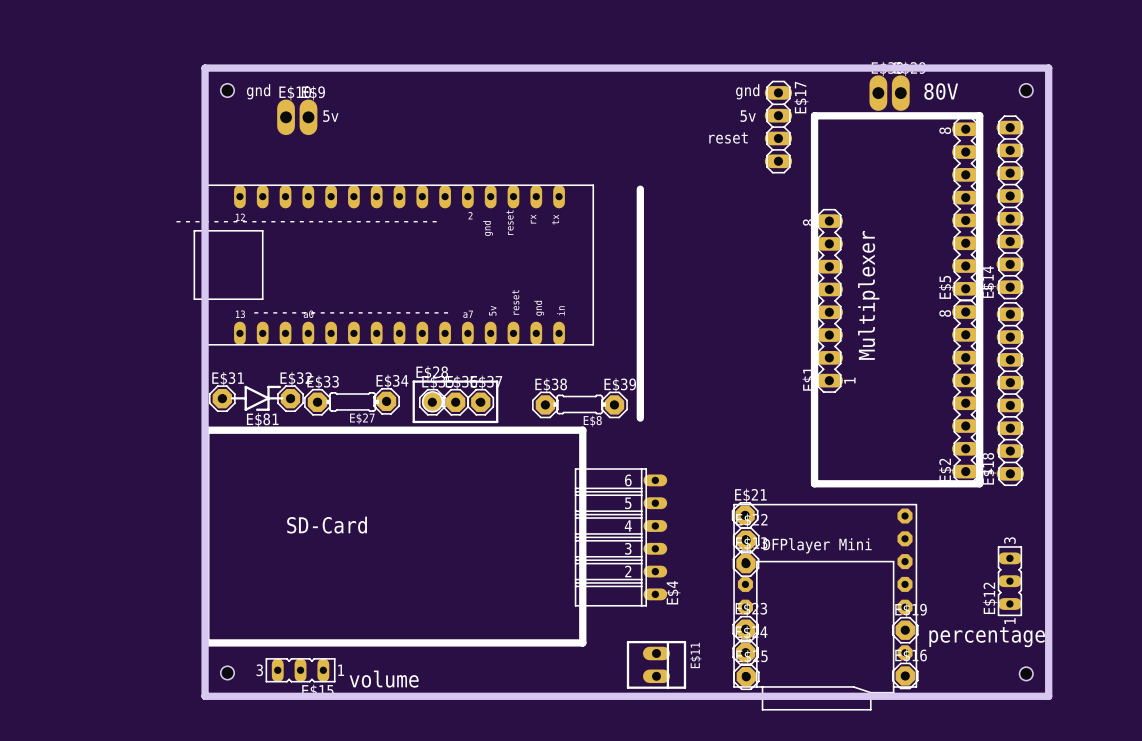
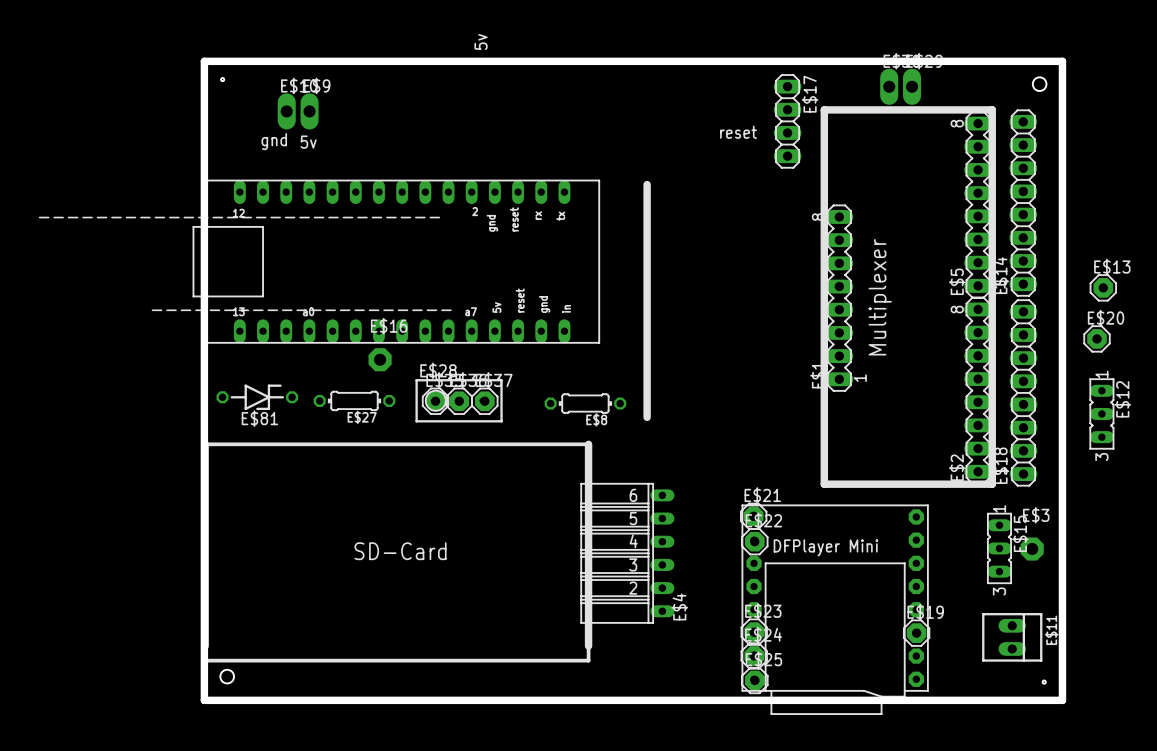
text: none -> 5v (481, 42)
hole size: [220, 83, 235, 98] -> [221, 78, 225, 82]
text position: gnd (258, 91) -> gnd (274, 141)
text: gnd (747, 91) -> none
text: 80V (941, 91) -> none
text position: 5v (330, 116) -> 5v (308, 142)
text: 5v (748, 116) -> none
E$20: none -> (1097, 338)
E$31: (222, 398) -> none
E$32: (290, 398) -> none
E$34: (386, 401) -> none
E$33: (317, 402) -> none
E$38: (545, 404) -> none
E$39: (614, 404) -> none
line: (205, 444) (205, 430) (582, 430) (582, 444) -> (205, 444) (588, 444)
text position: SD-Card (327, 525) -> SD-Card (400, 551)
E$4 position: (621, 537) -> (627, 553)
E$12 text position: 3 (1009, 540) -> 3 (1101, 457)
E$3: none -> (1032, 548)
E$13 position: (746, 563) -> (1103, 287)
E$12 position: (1009, 581) -> (1101, 413)
E$12 name position: E$12 (990, 598) -> E$12 (1122, 399)
E$12 text position: 1 (1009, 621) -> 1 (1101, 374)
text: percentage (987, 637) -> none
line: (205, 642) (582, 642) -> (205, 646) (205, 660) (588, 660) (588, 646)
E$16 footprint: [892, 662, 919, 690] -> [368, 348, 392, 372]
E$11 position: (656, 664) -> (1012, 637)
hole size: [1019, 667, 1033, 681] -> [1042, 680, 1046, 684]
E$15 rotation: 0° (300, 670) -> 90° counterclockwise (999, 548)
E$15 position: (300, 670) -> (999, 548)
text: volume (384, 679) -> none

